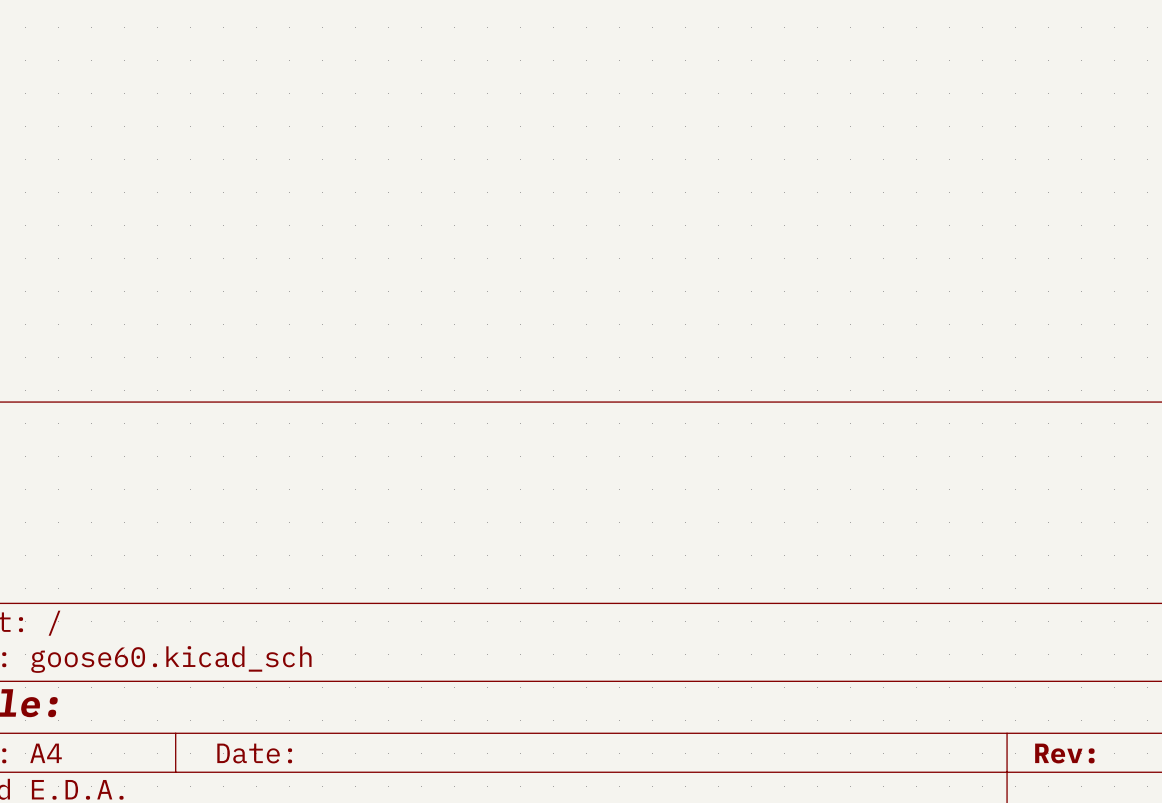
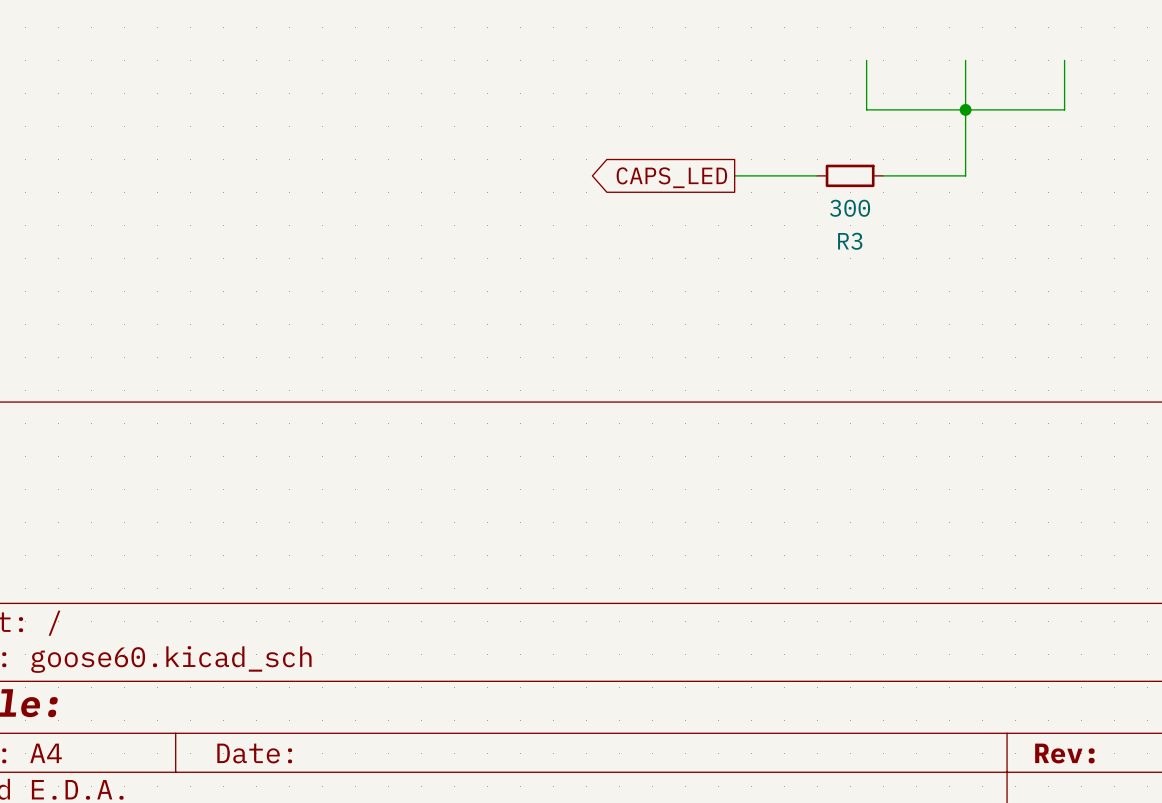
wire: none -> (866, 60) (866, 109) (1064, 109) (1064, 60)
wire: none -> (965, 60) (965, 175) (883, 175)
junction: none -> (965, 109)
wire: none -> (734, 175) (817, 175)
R3: none -> 300 (850, 175)
global label: none -> CAPS_LED (671, 177)

